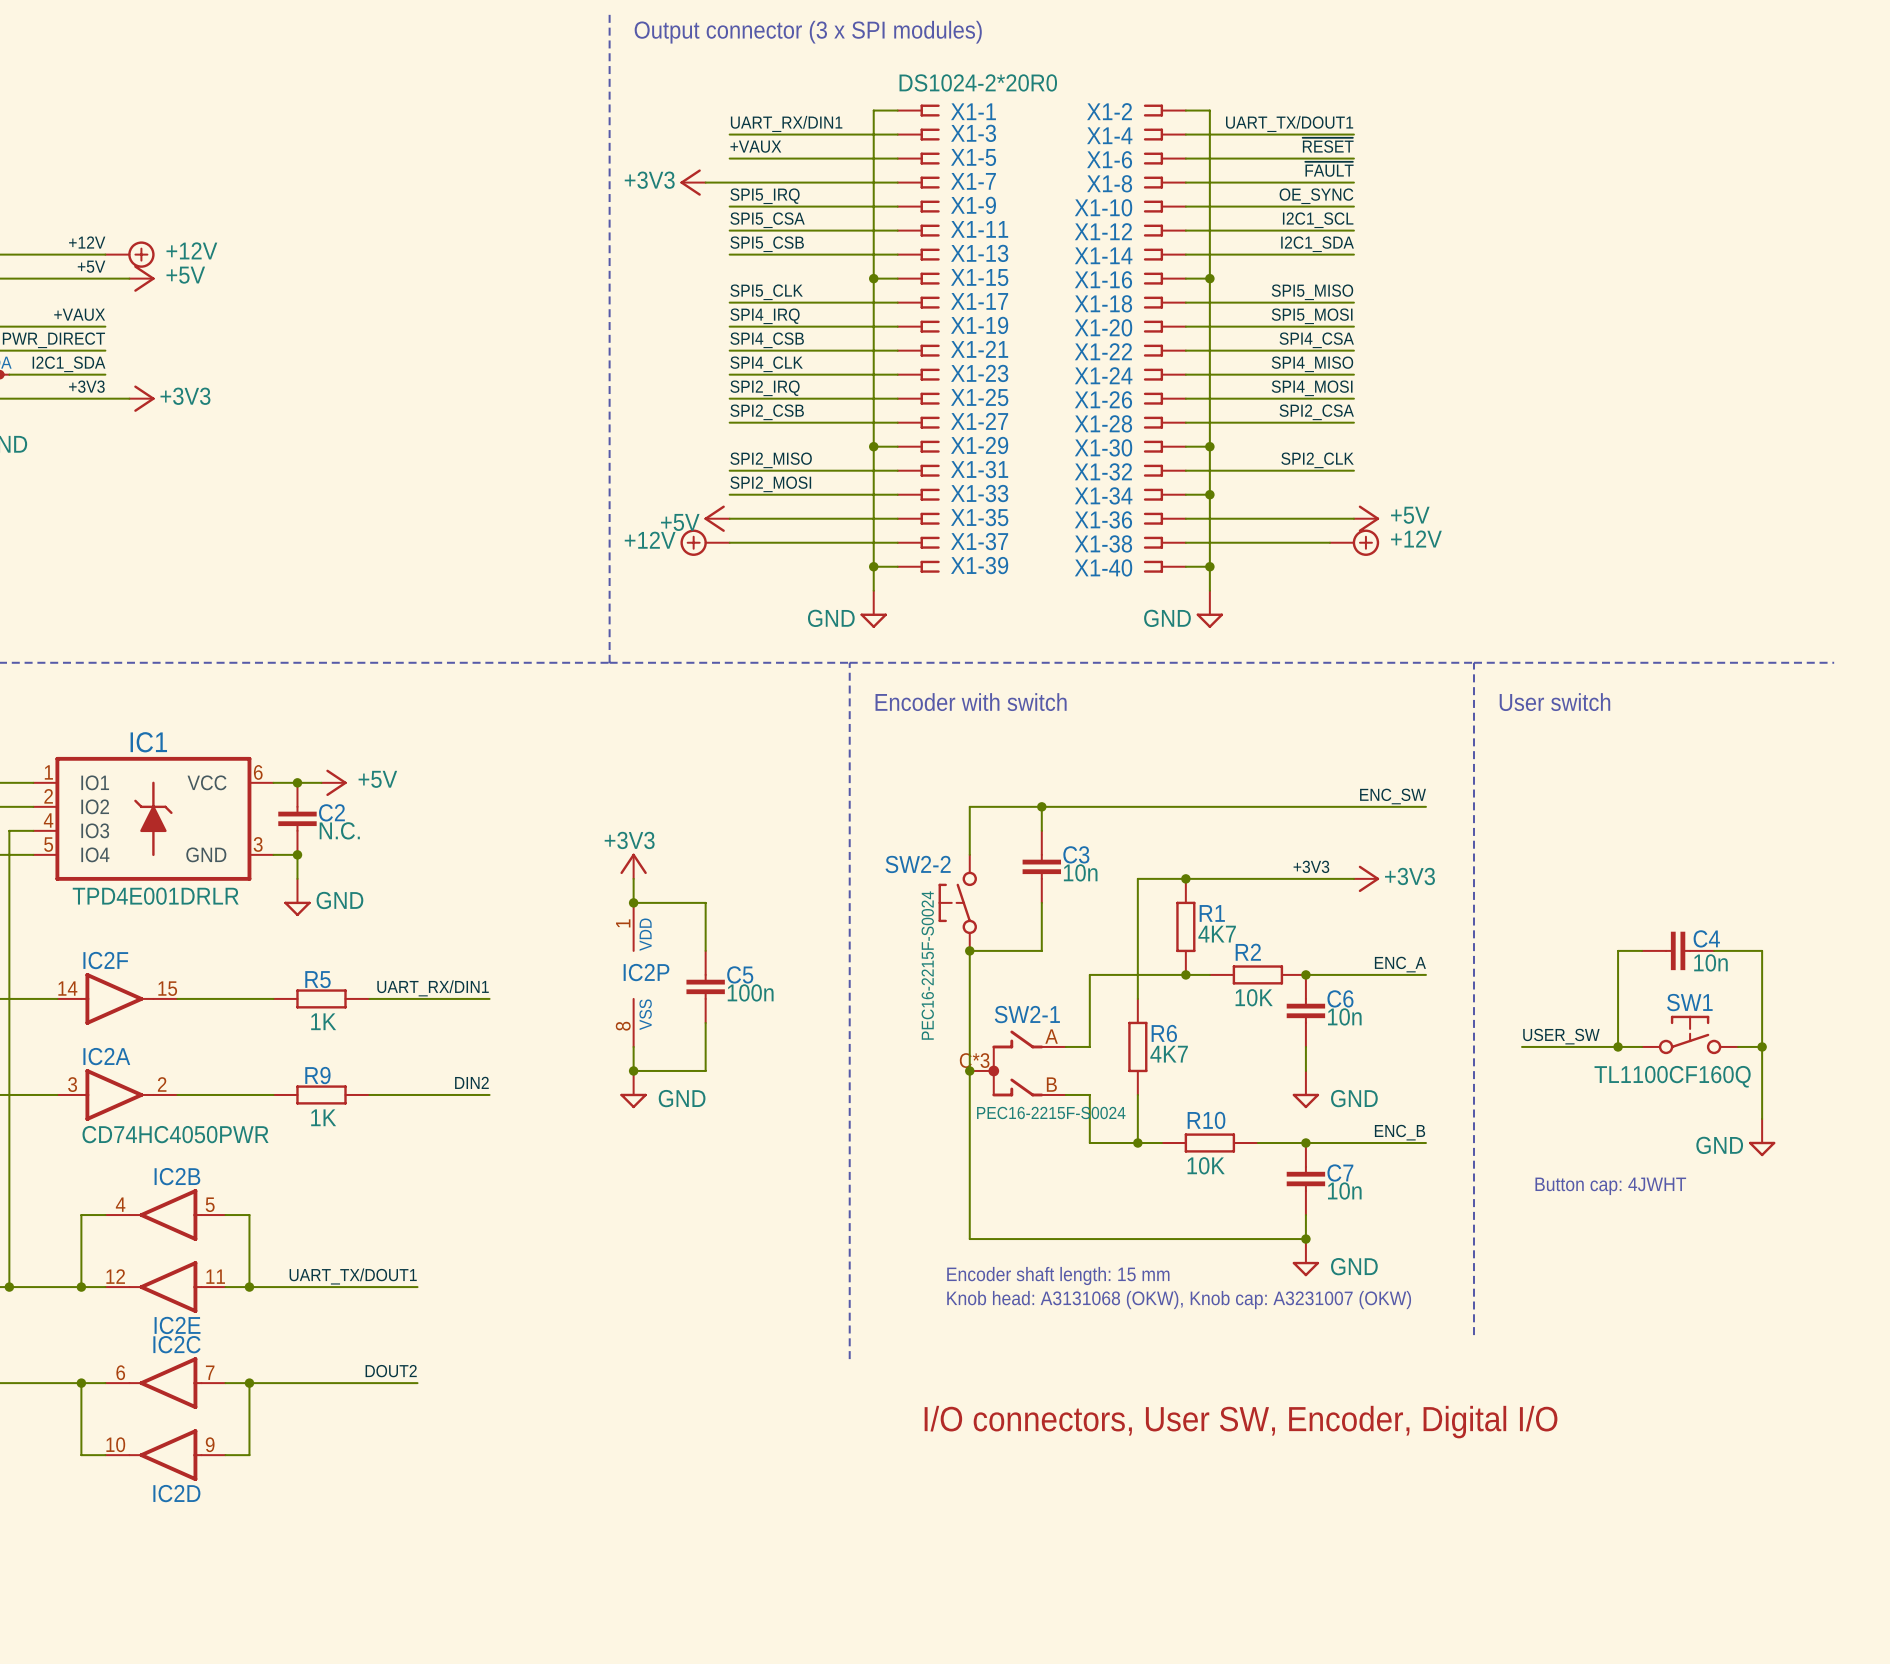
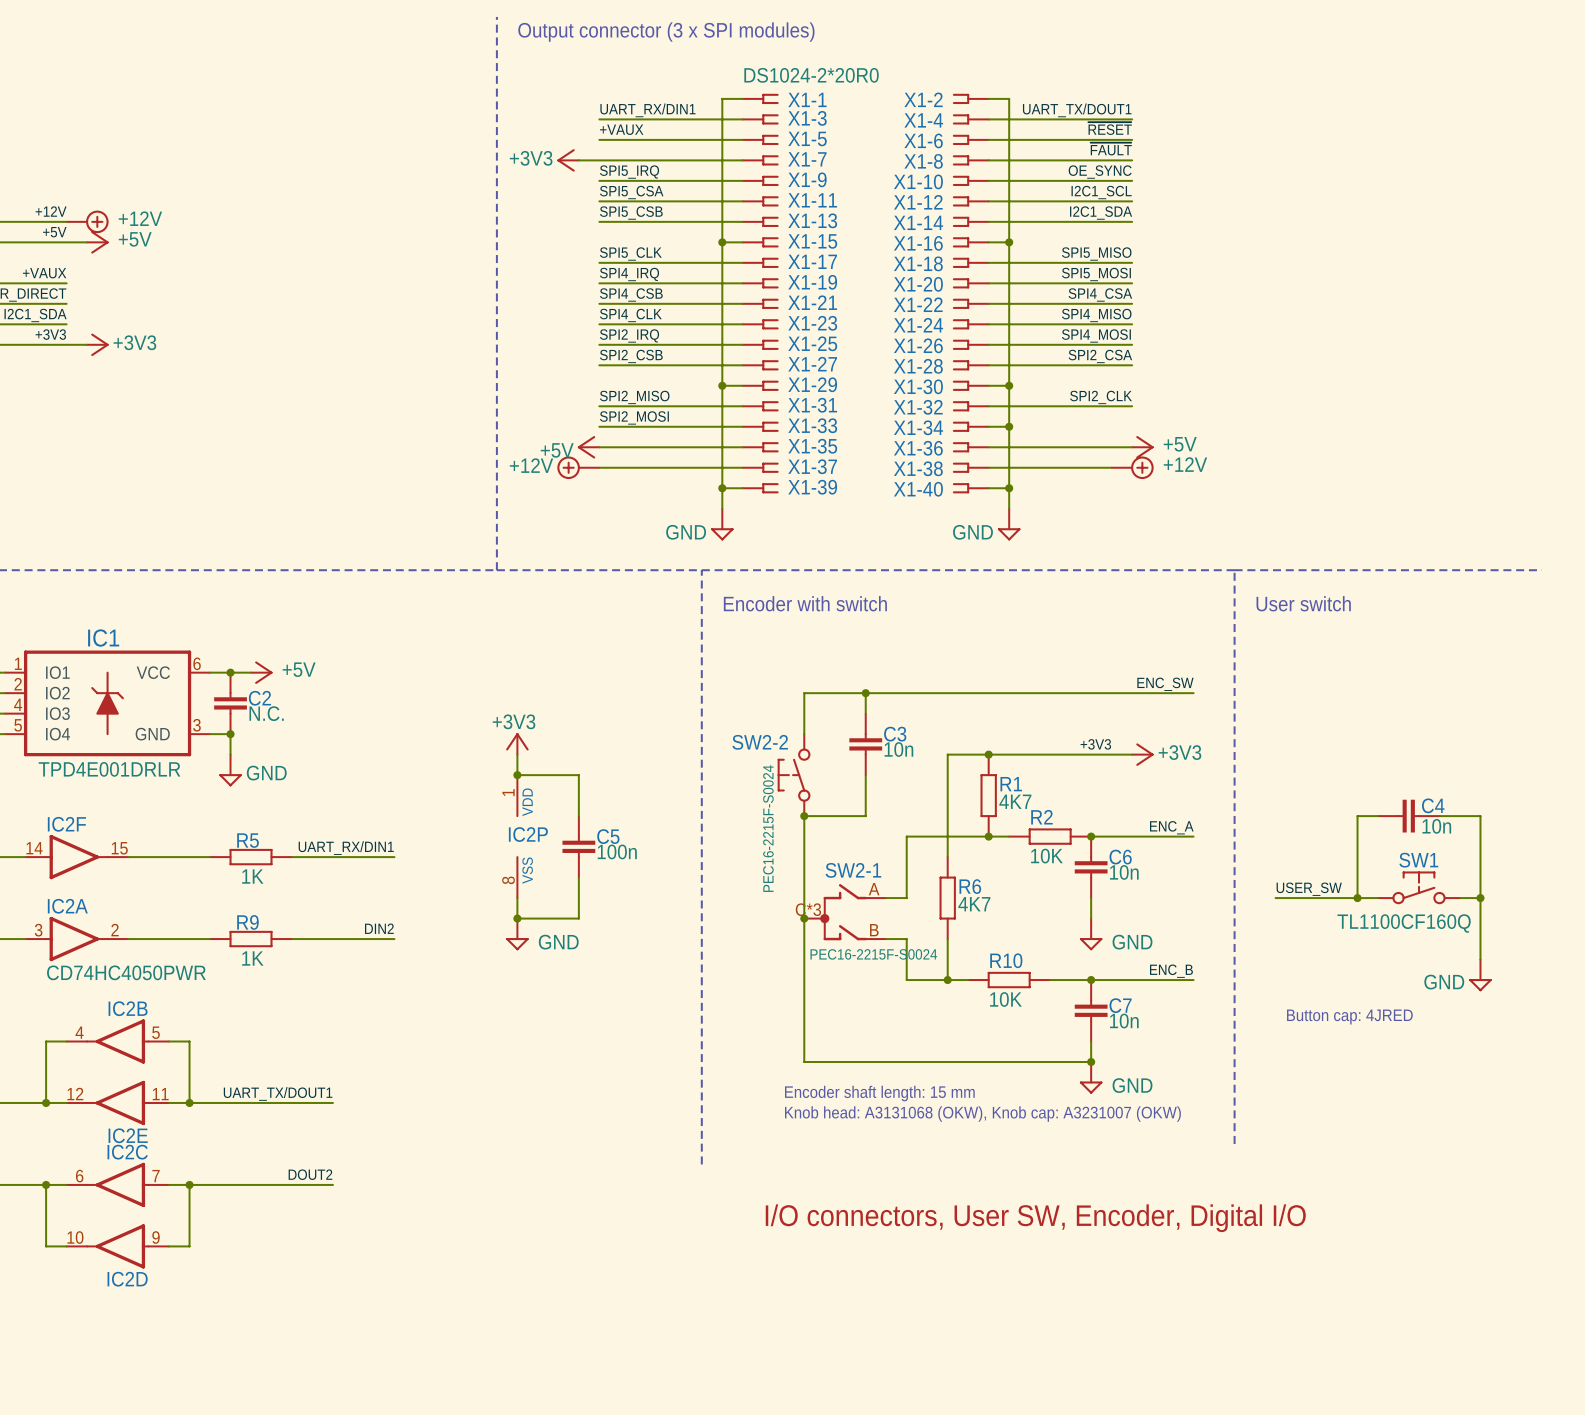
text: Button cap: 4JWHT (1610, 1186) -> Button cap: 4JRED (1349, 1017)

